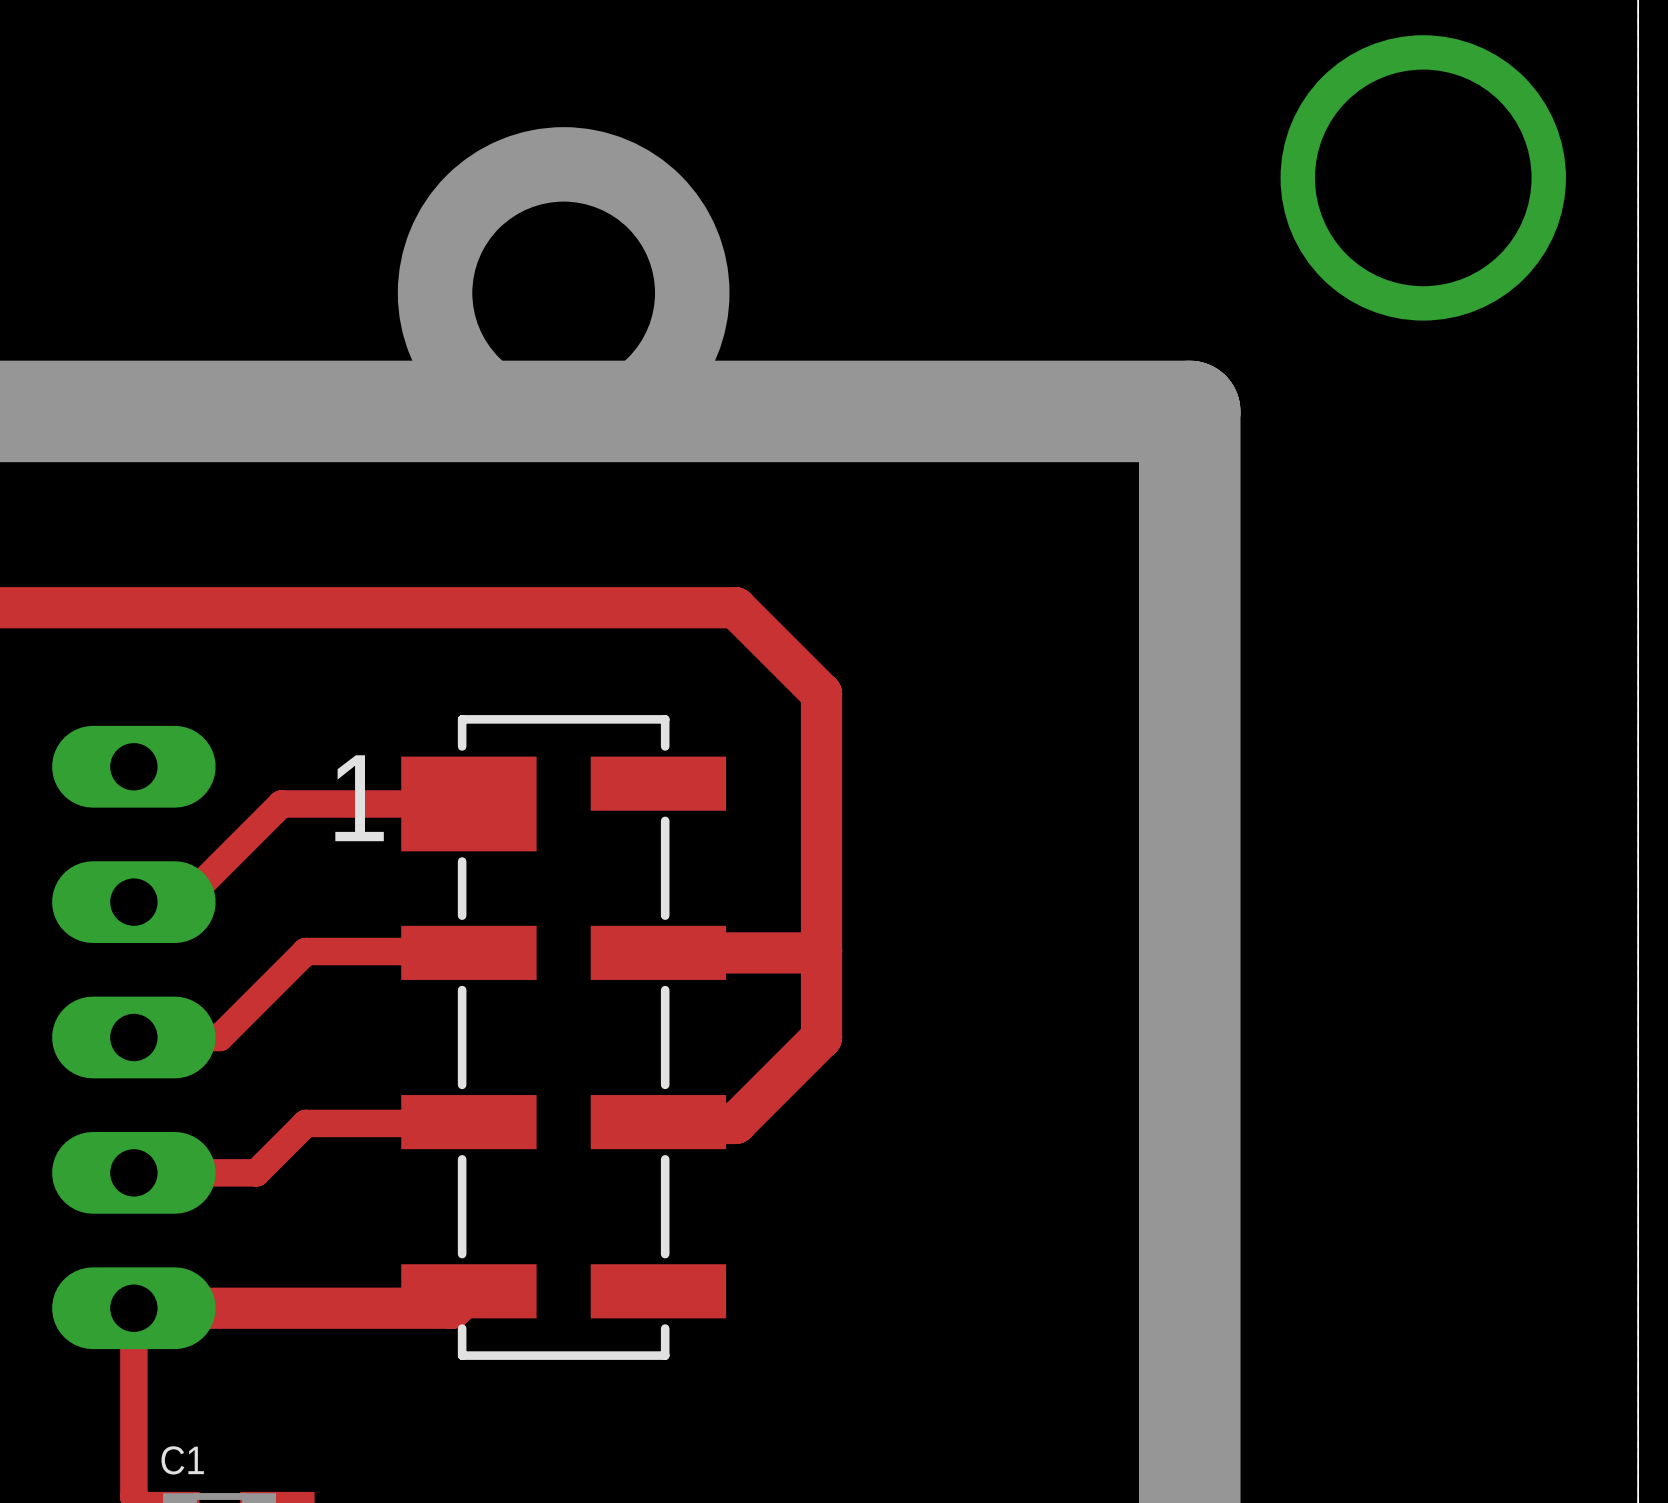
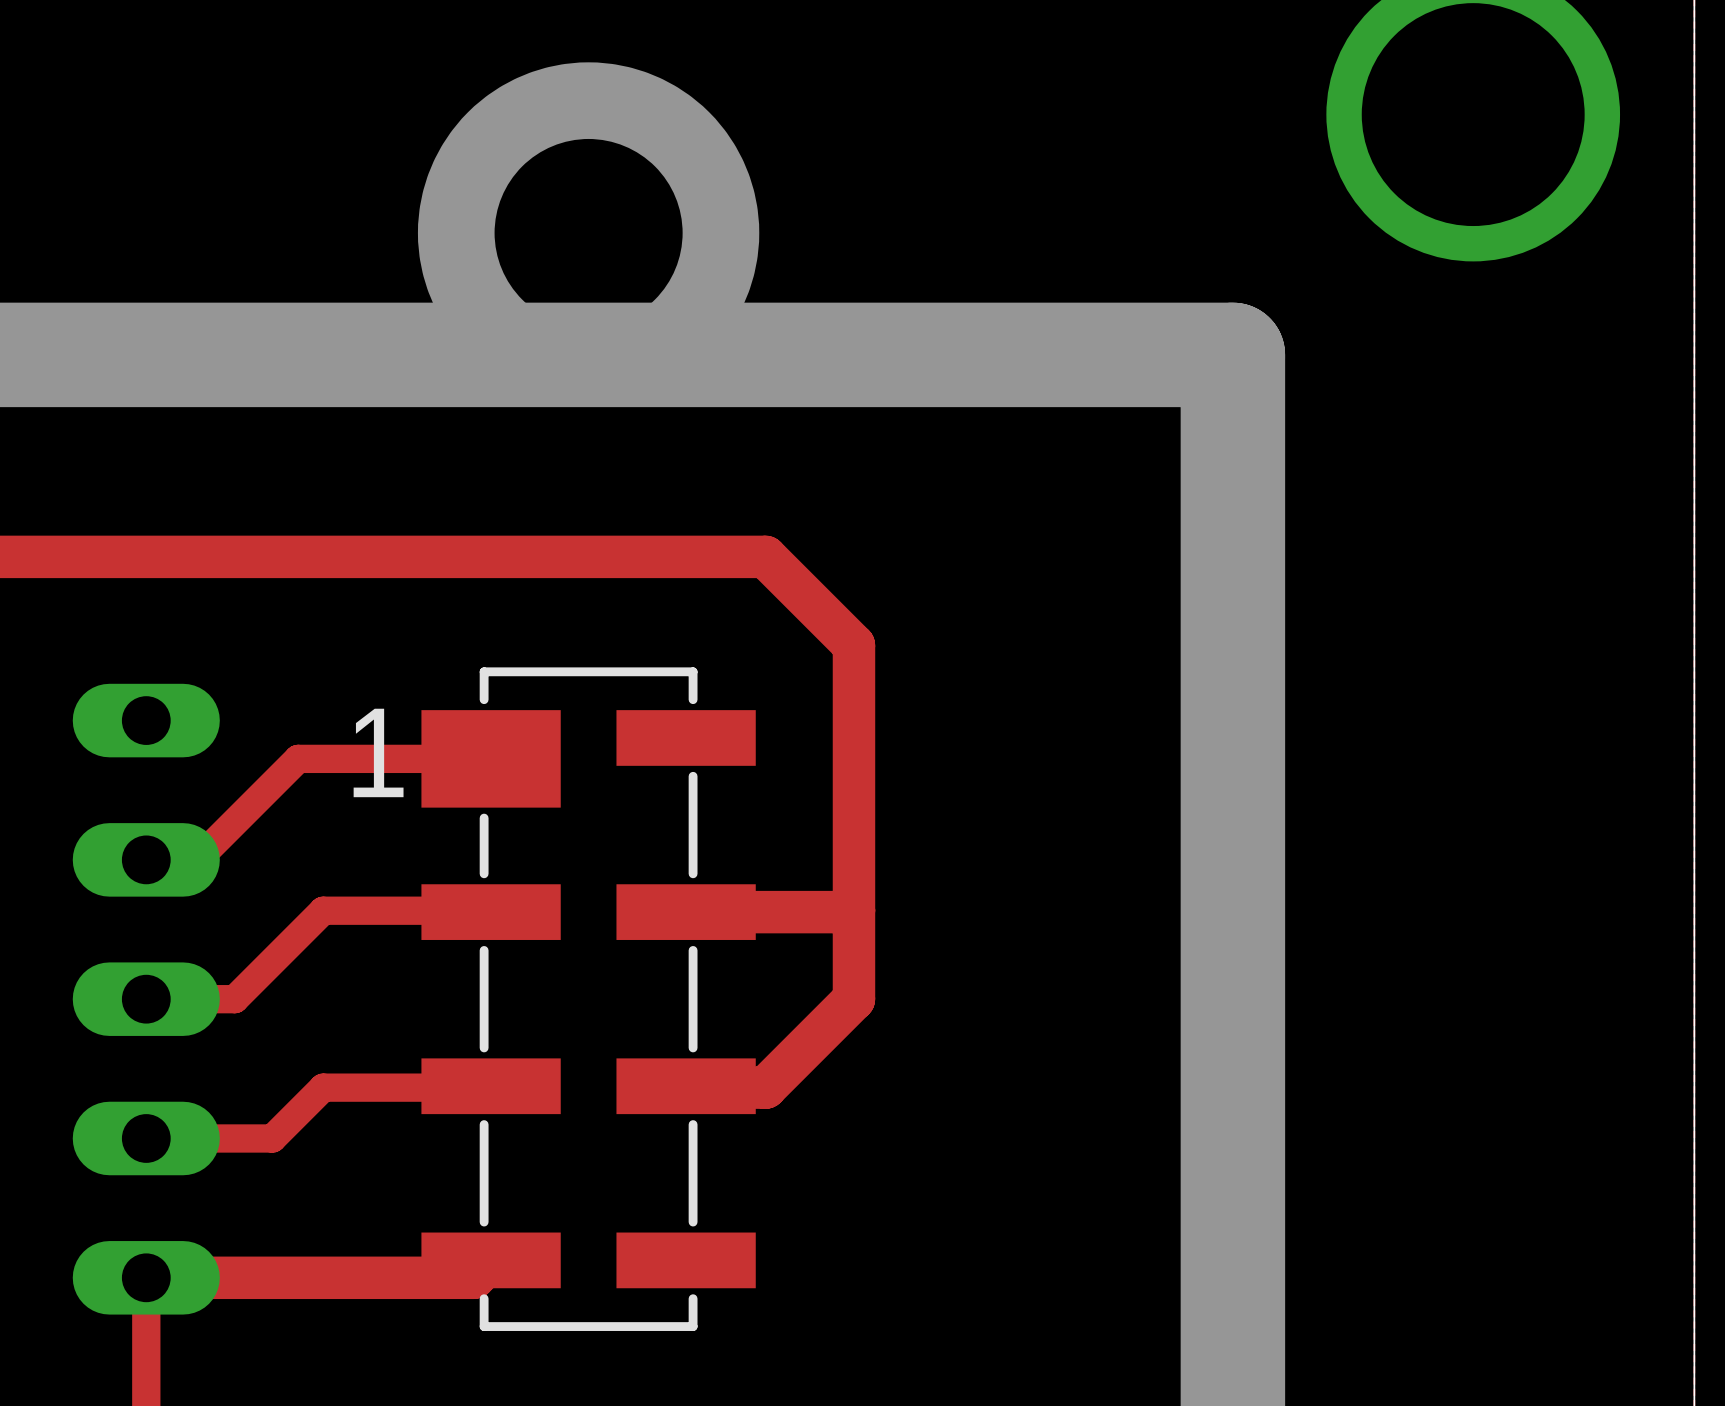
part footprint: [52, 725, 216, 1350] -> [72, 683, 220, 1315]

